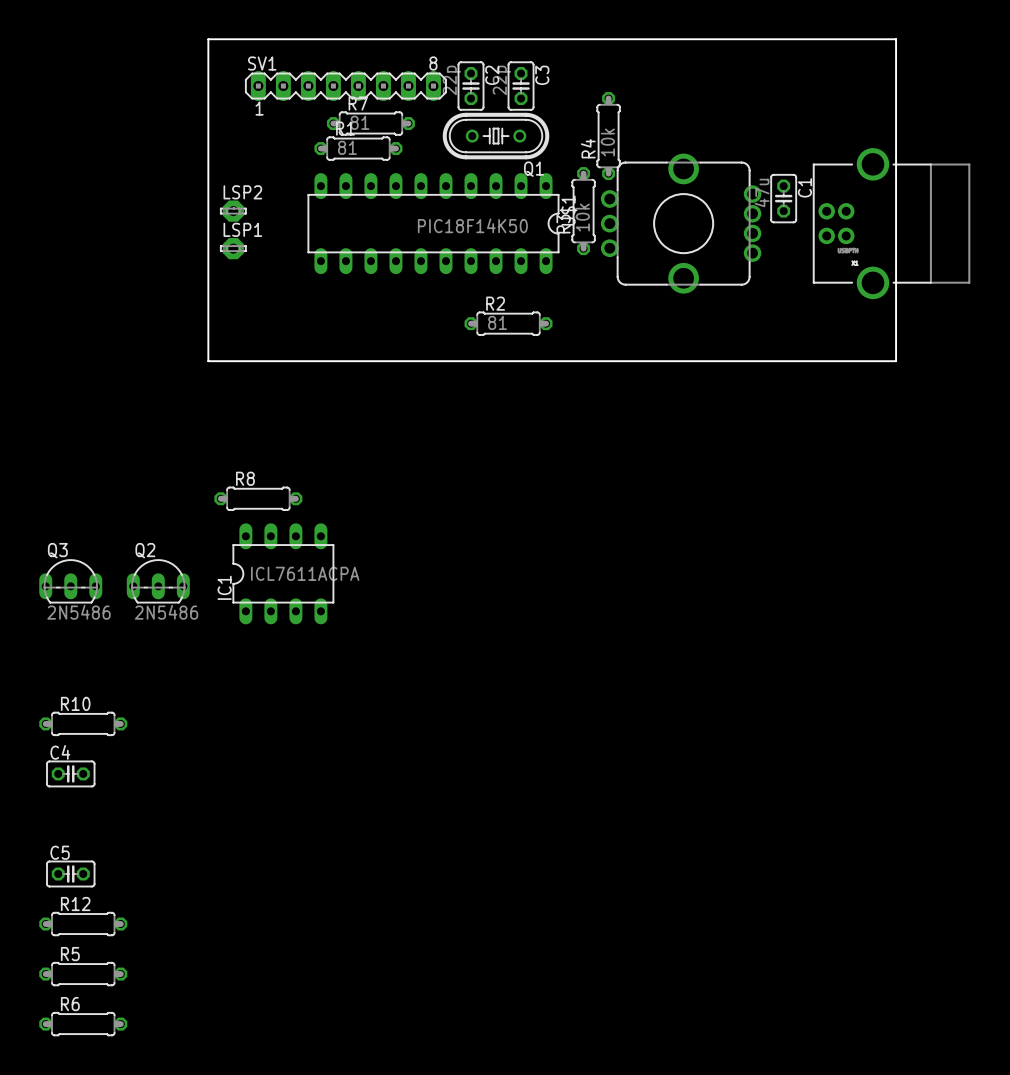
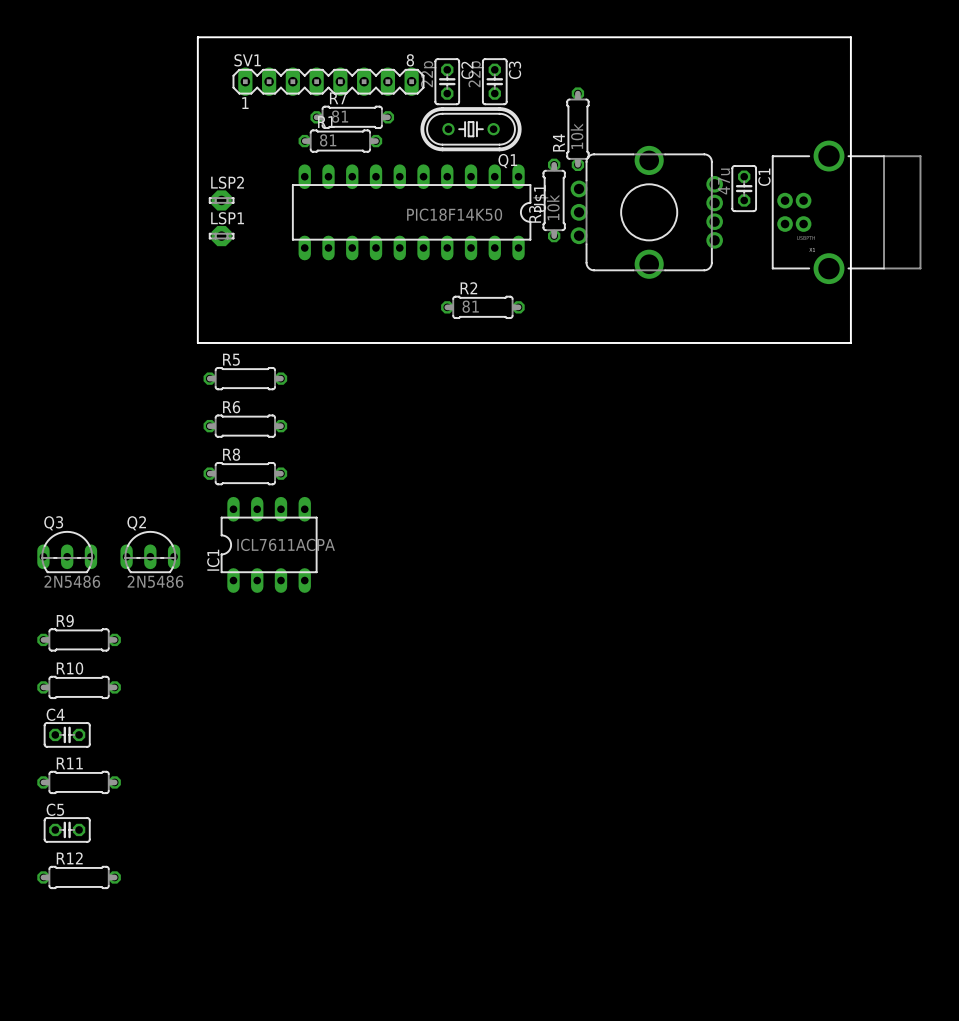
R9: none -> (79, 639)
R11: none -> (79, 782)
R5 position: (83, 974) -> (245, 378)
R6 position: (83, 1024) -> (245, 426)

